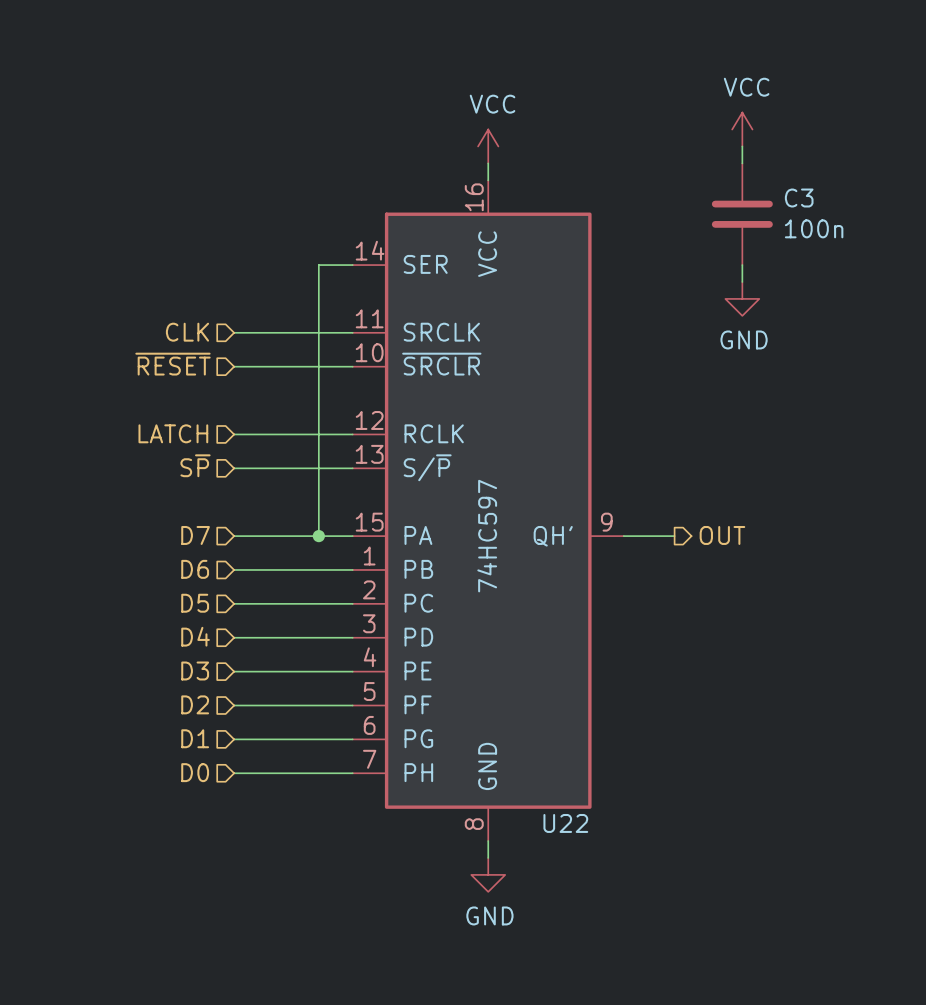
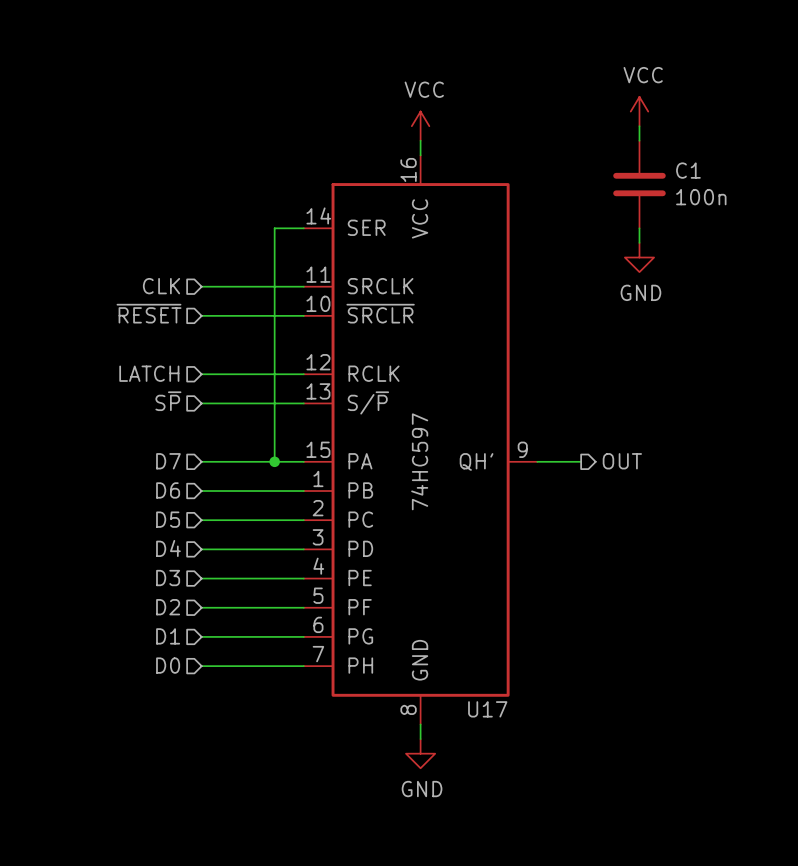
C3 name: C3 (799, 198) -> C1 (688, 170)
U22 name: U22 (565, 823) -> U17 (487, 709)

